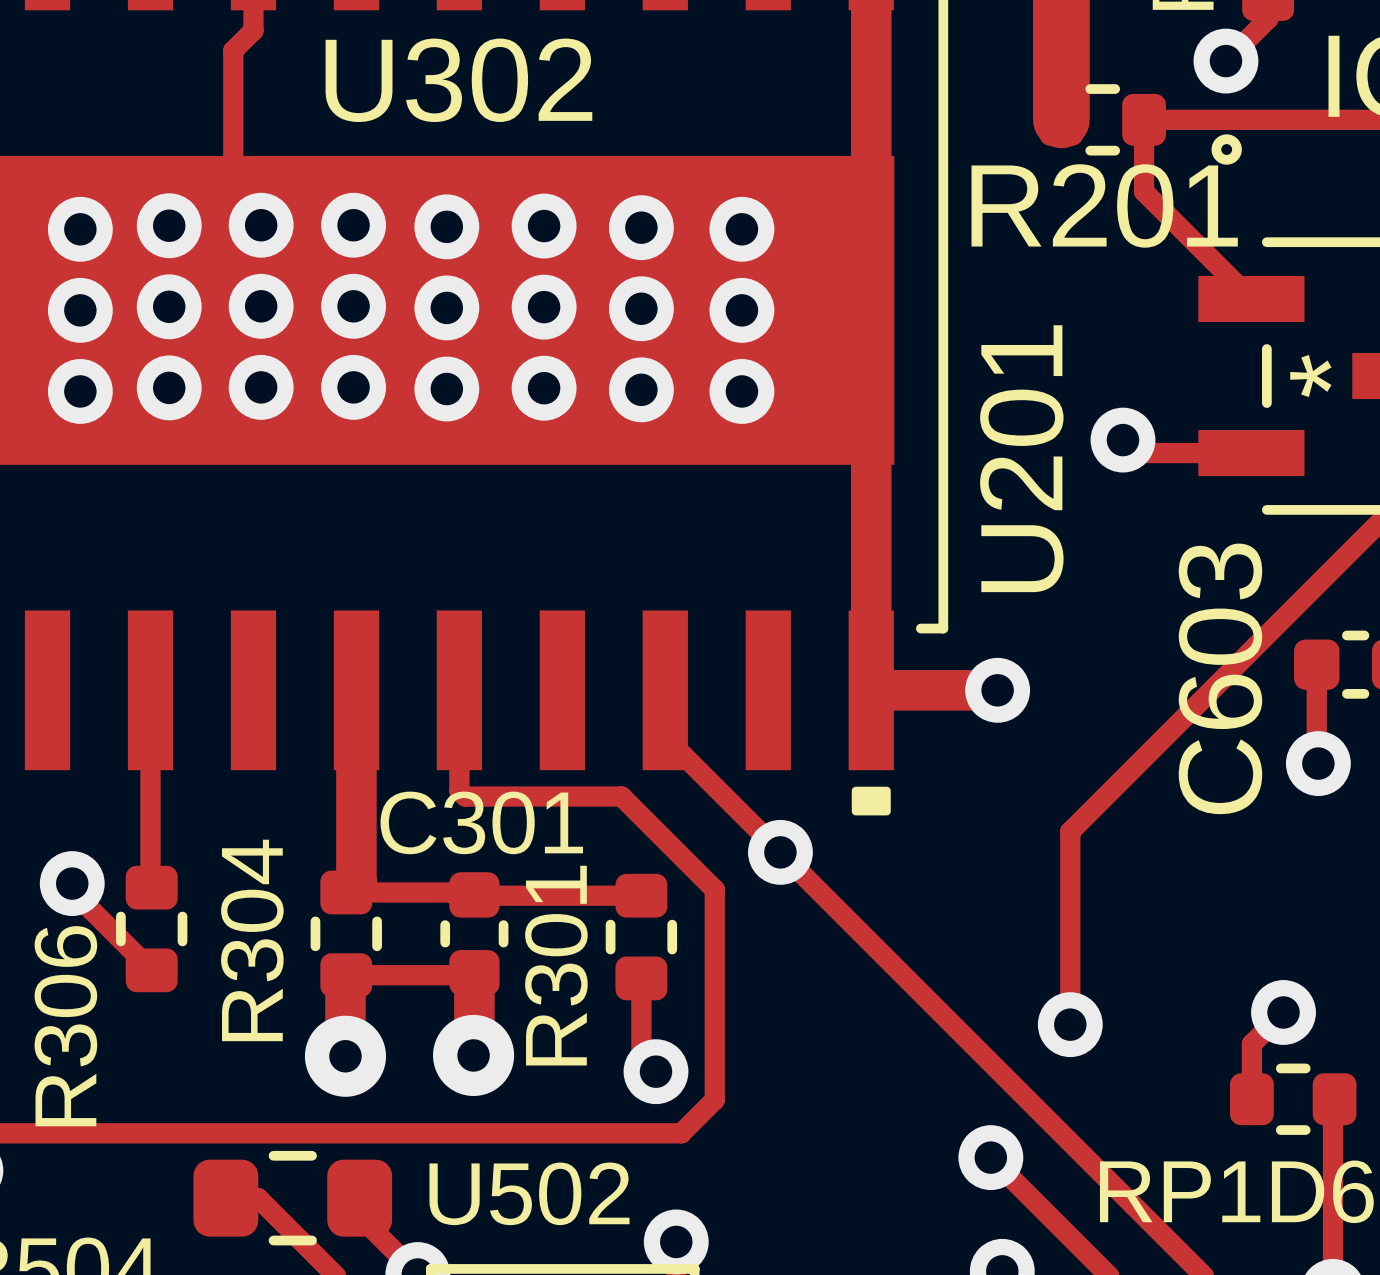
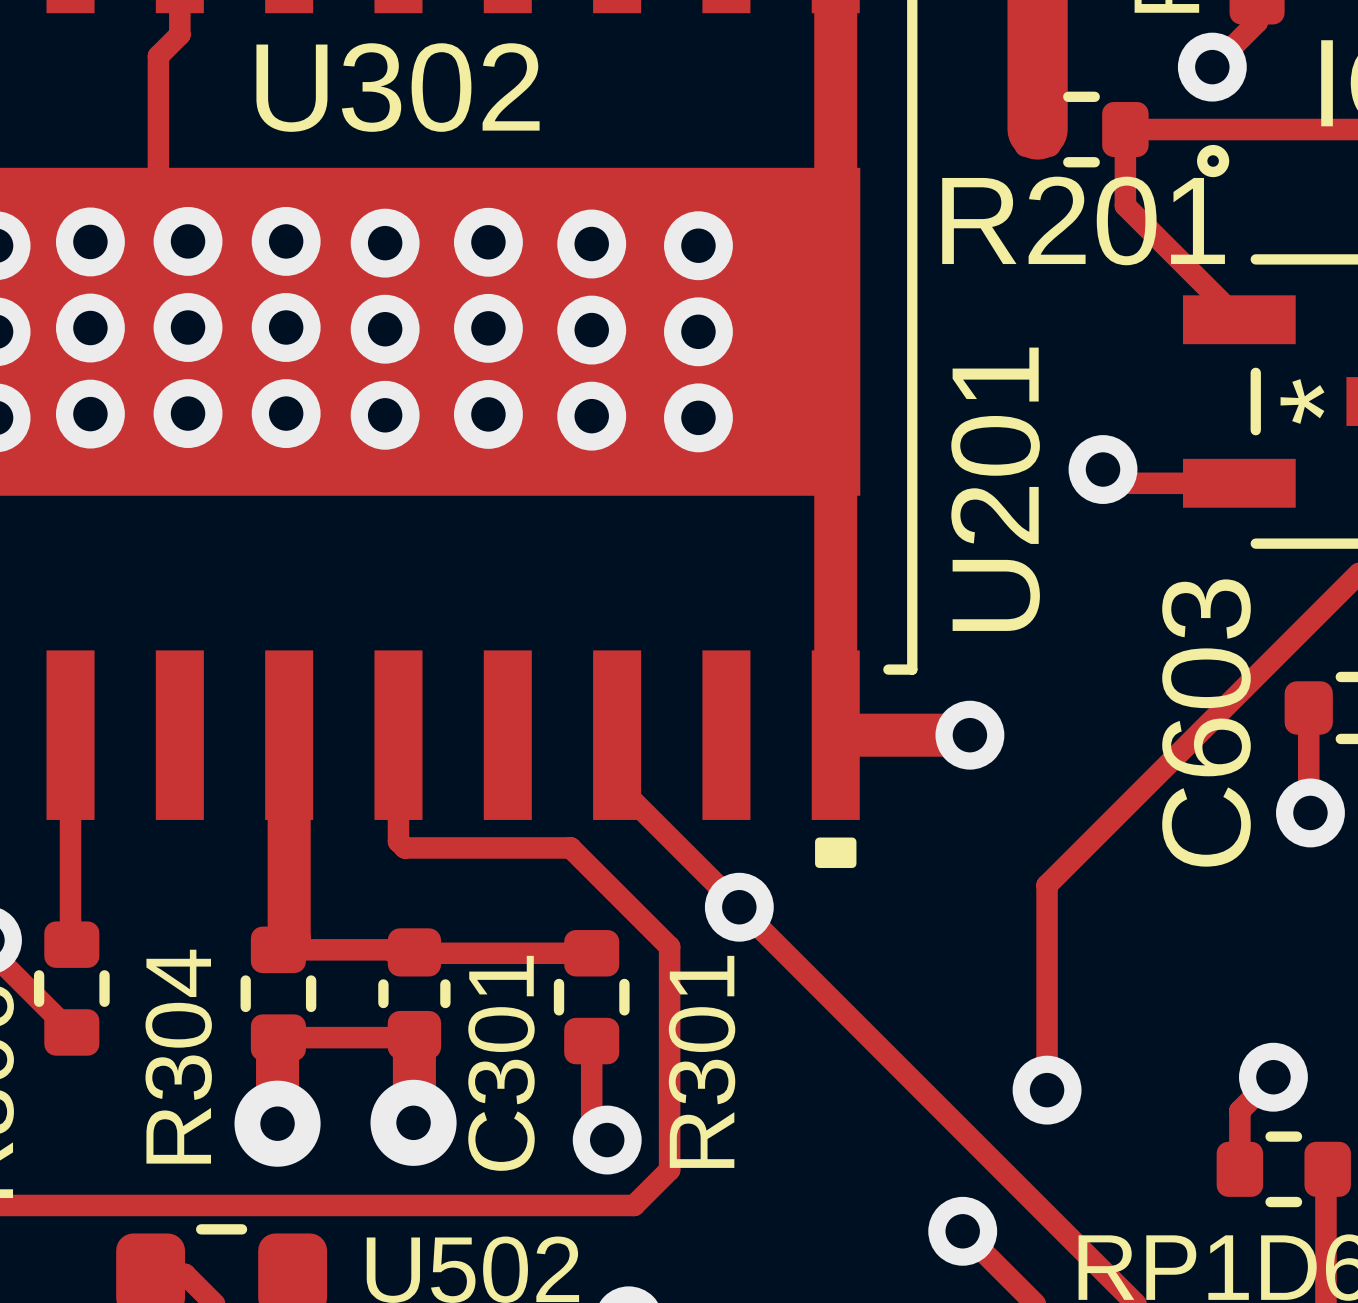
C301 name rotation: 0° (481, 822) -> 90° counterclockwise (501, 1063)
R304 name position: R304 (252, 940) -> R304 (178, 1056)
R301 name position: R301 (556, 965) -> R301 (702, 1061)

